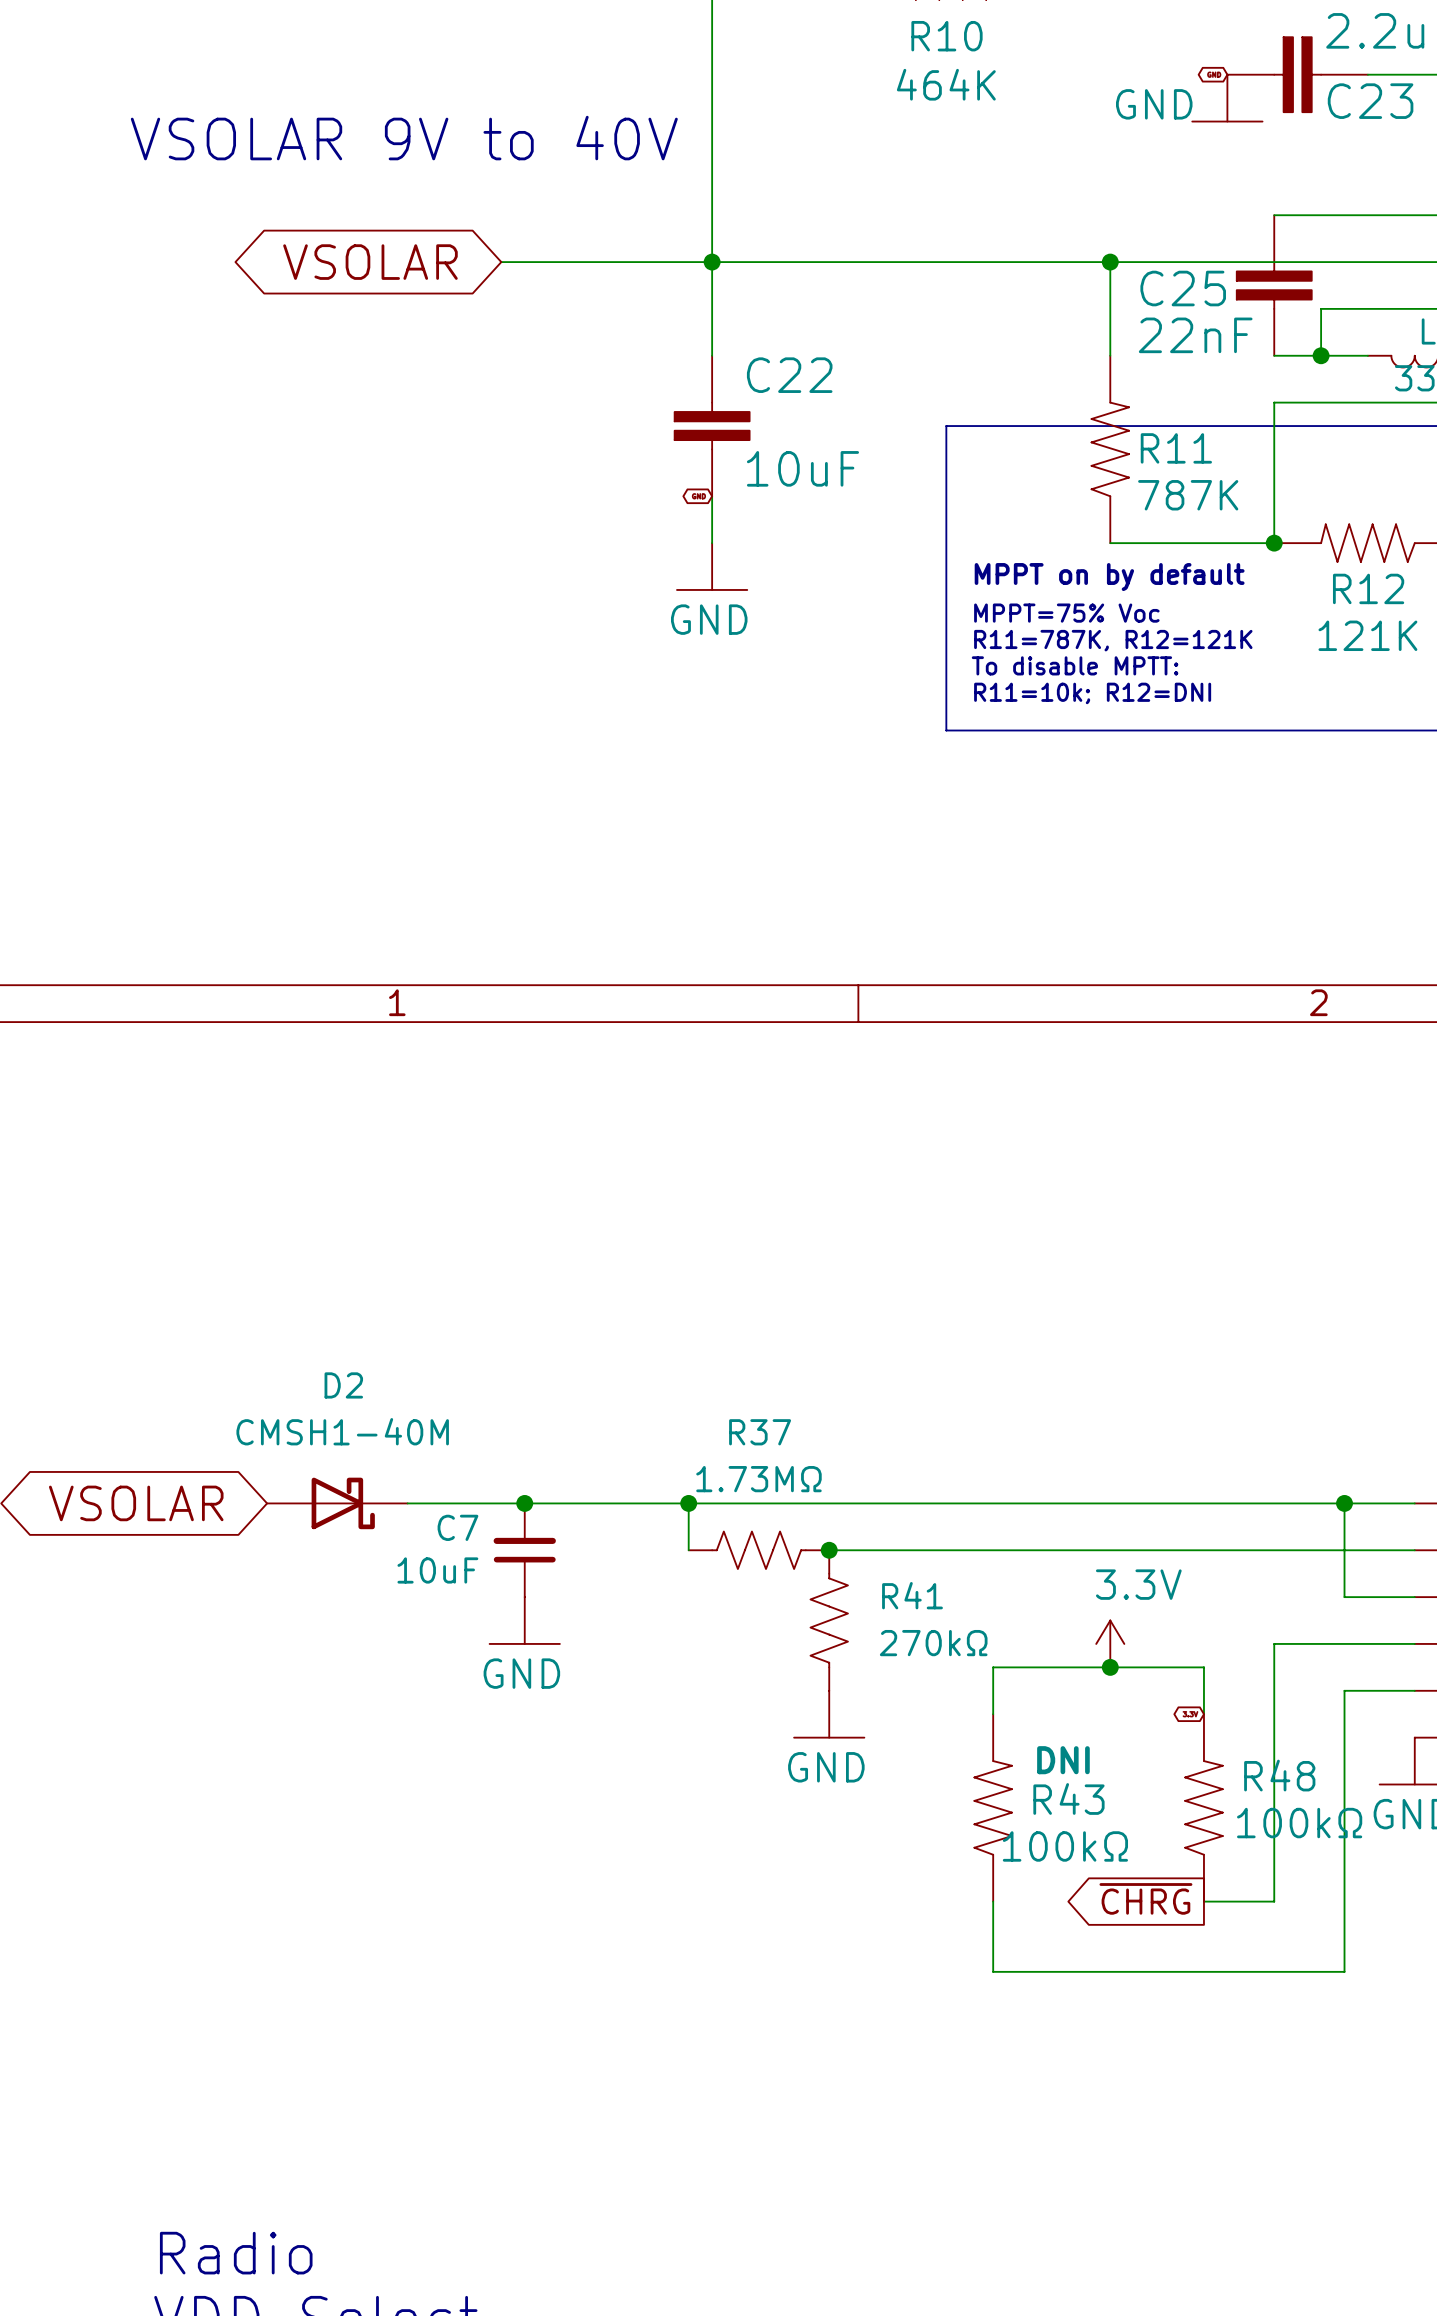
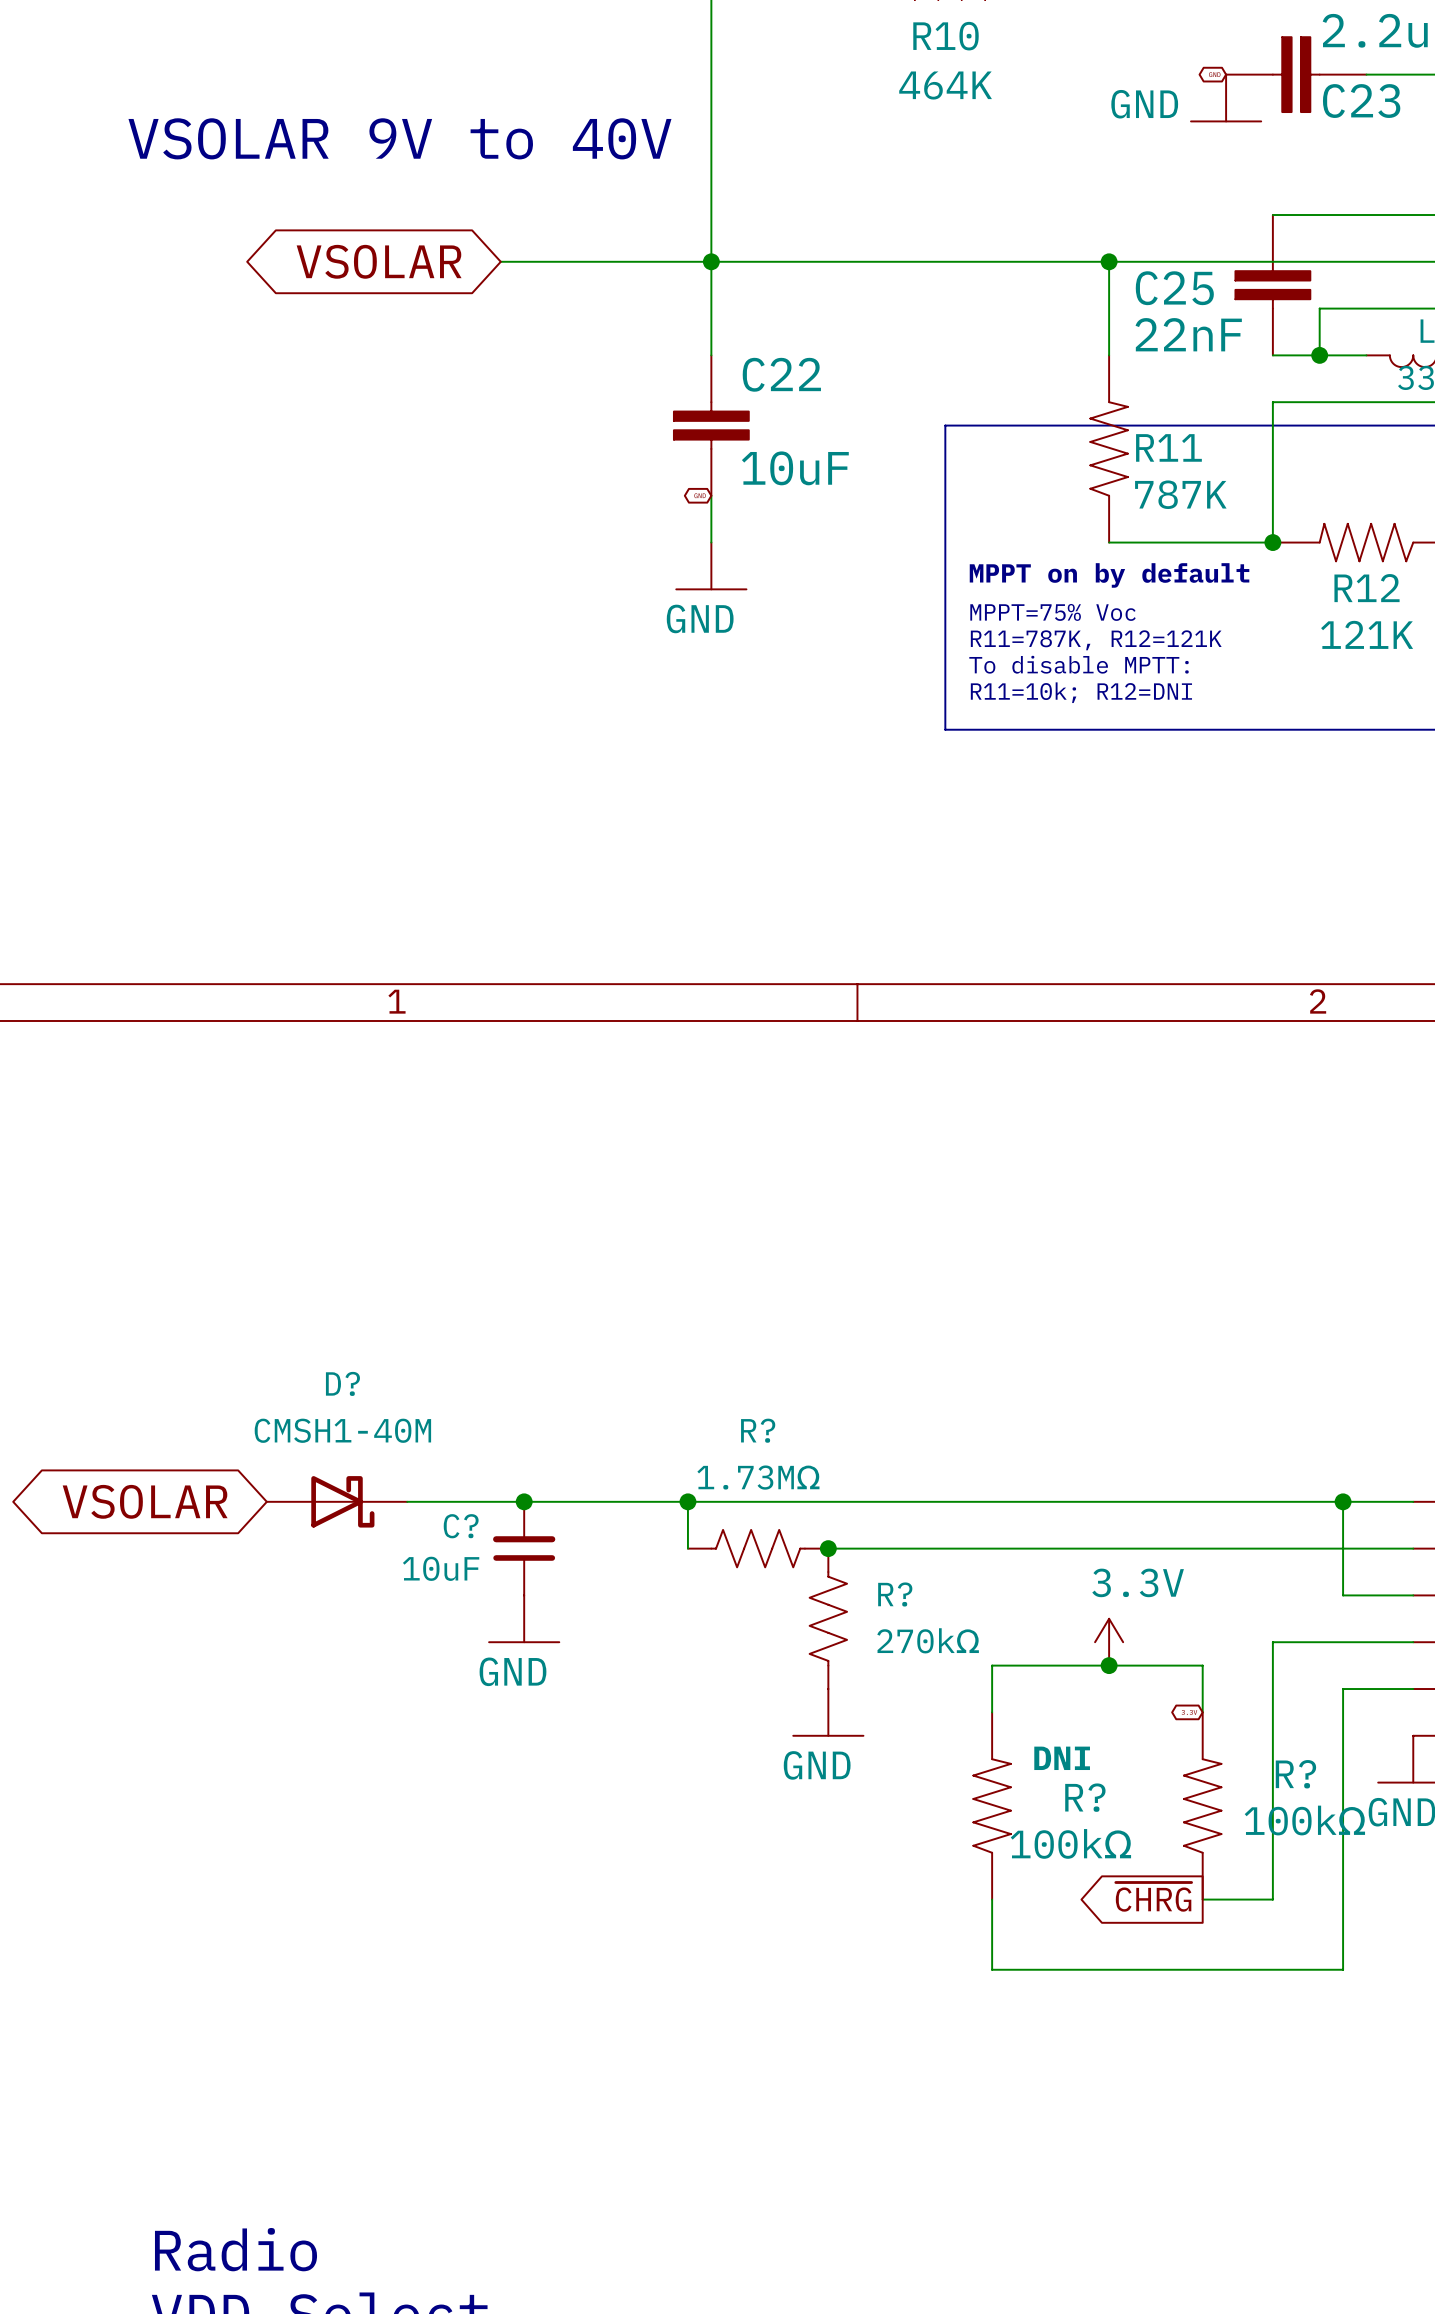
D2 name: D2 (343, 1385) -> D? (342, 1383)
R37 name: R37 (760, 1432) -> R? (758, 1430)
C7 name: C7 (457, 1527) -> C? (461, 1526)
R41 name: R41 (912, 1595) -> R? (895, 1594)
R48 name: R48 (1279, 1775) -> R? (1295, 1774)
R43 name: R43 (1068, 1798) -> R? (1085, 1797)

